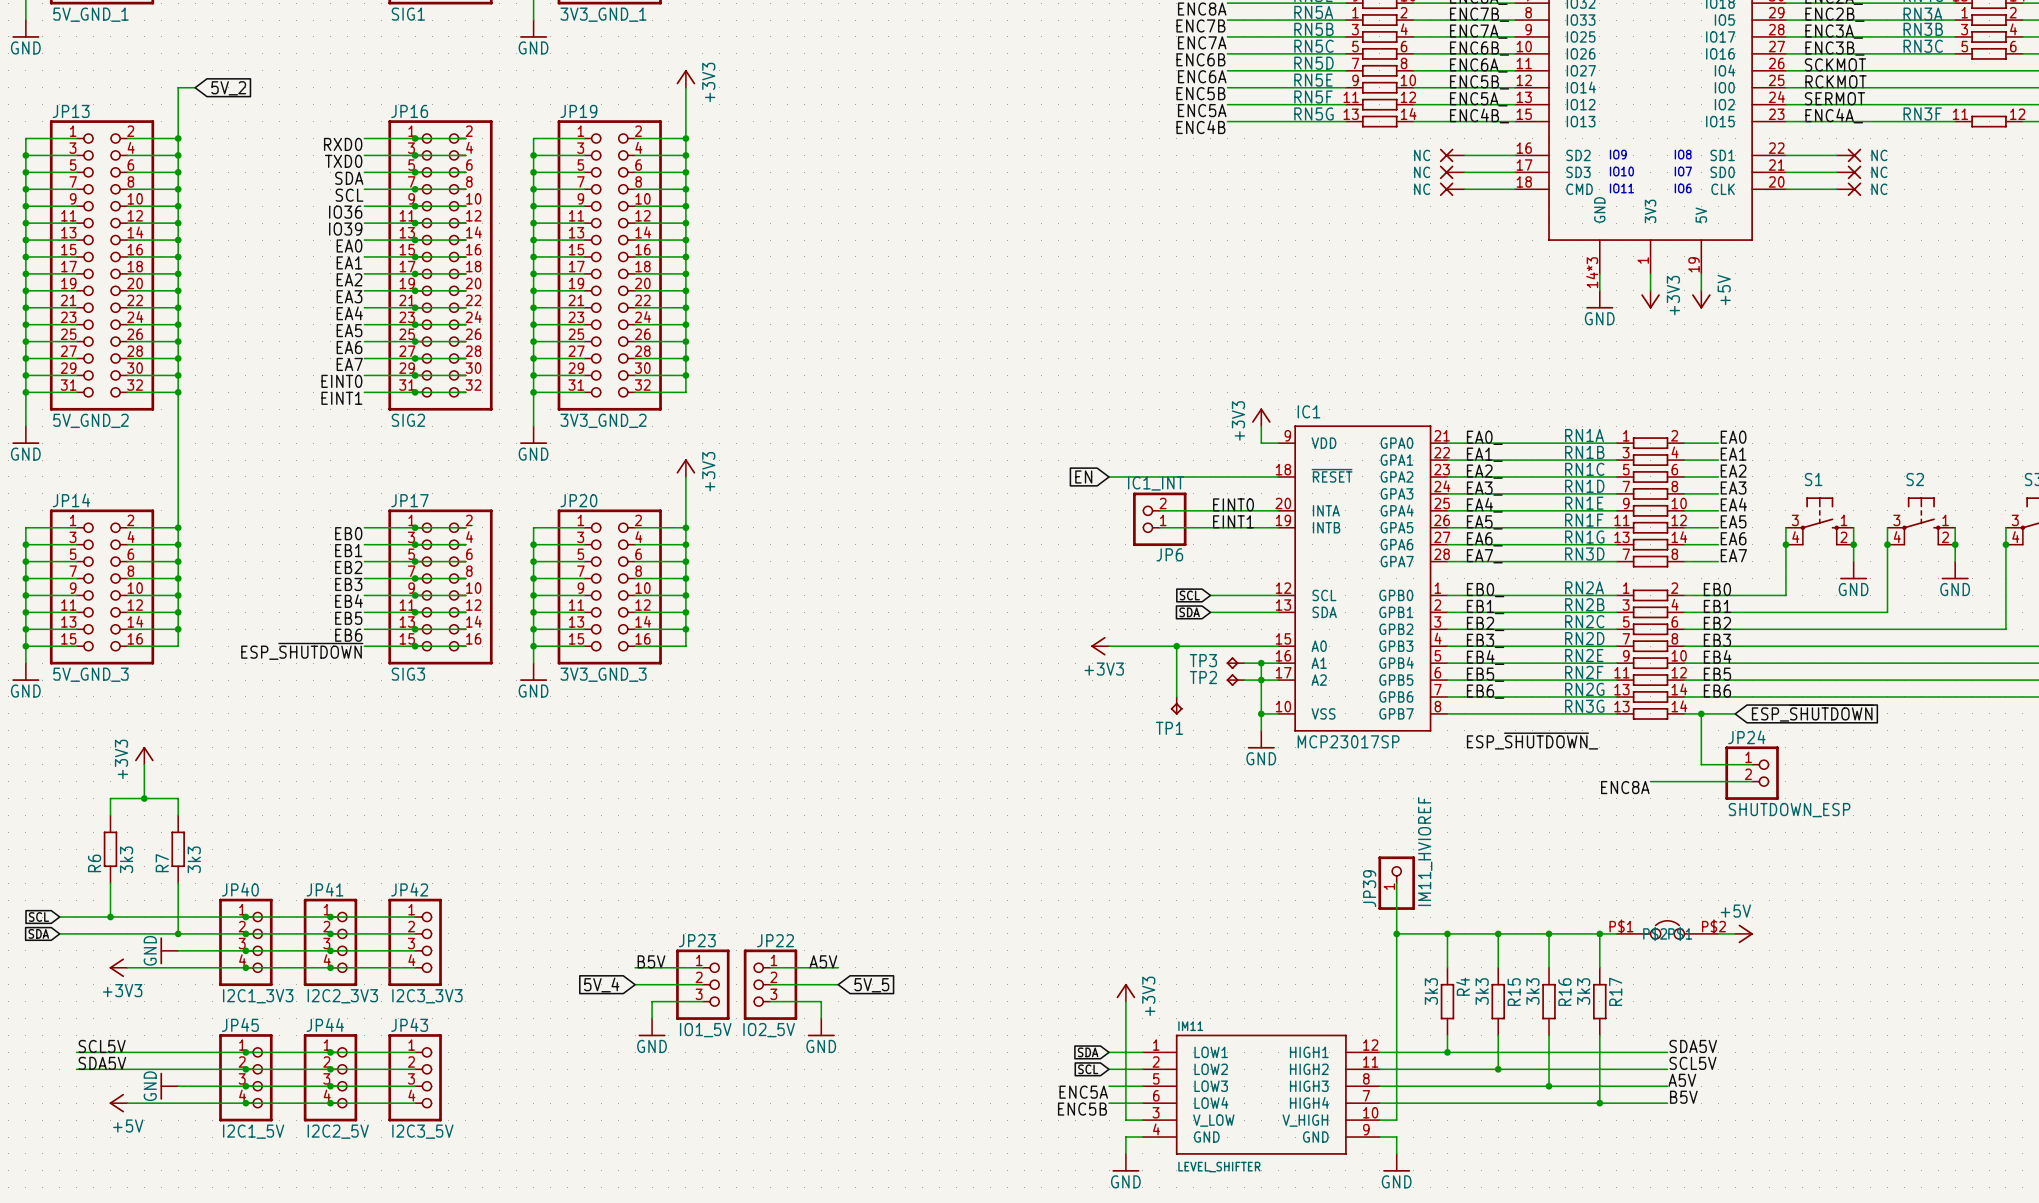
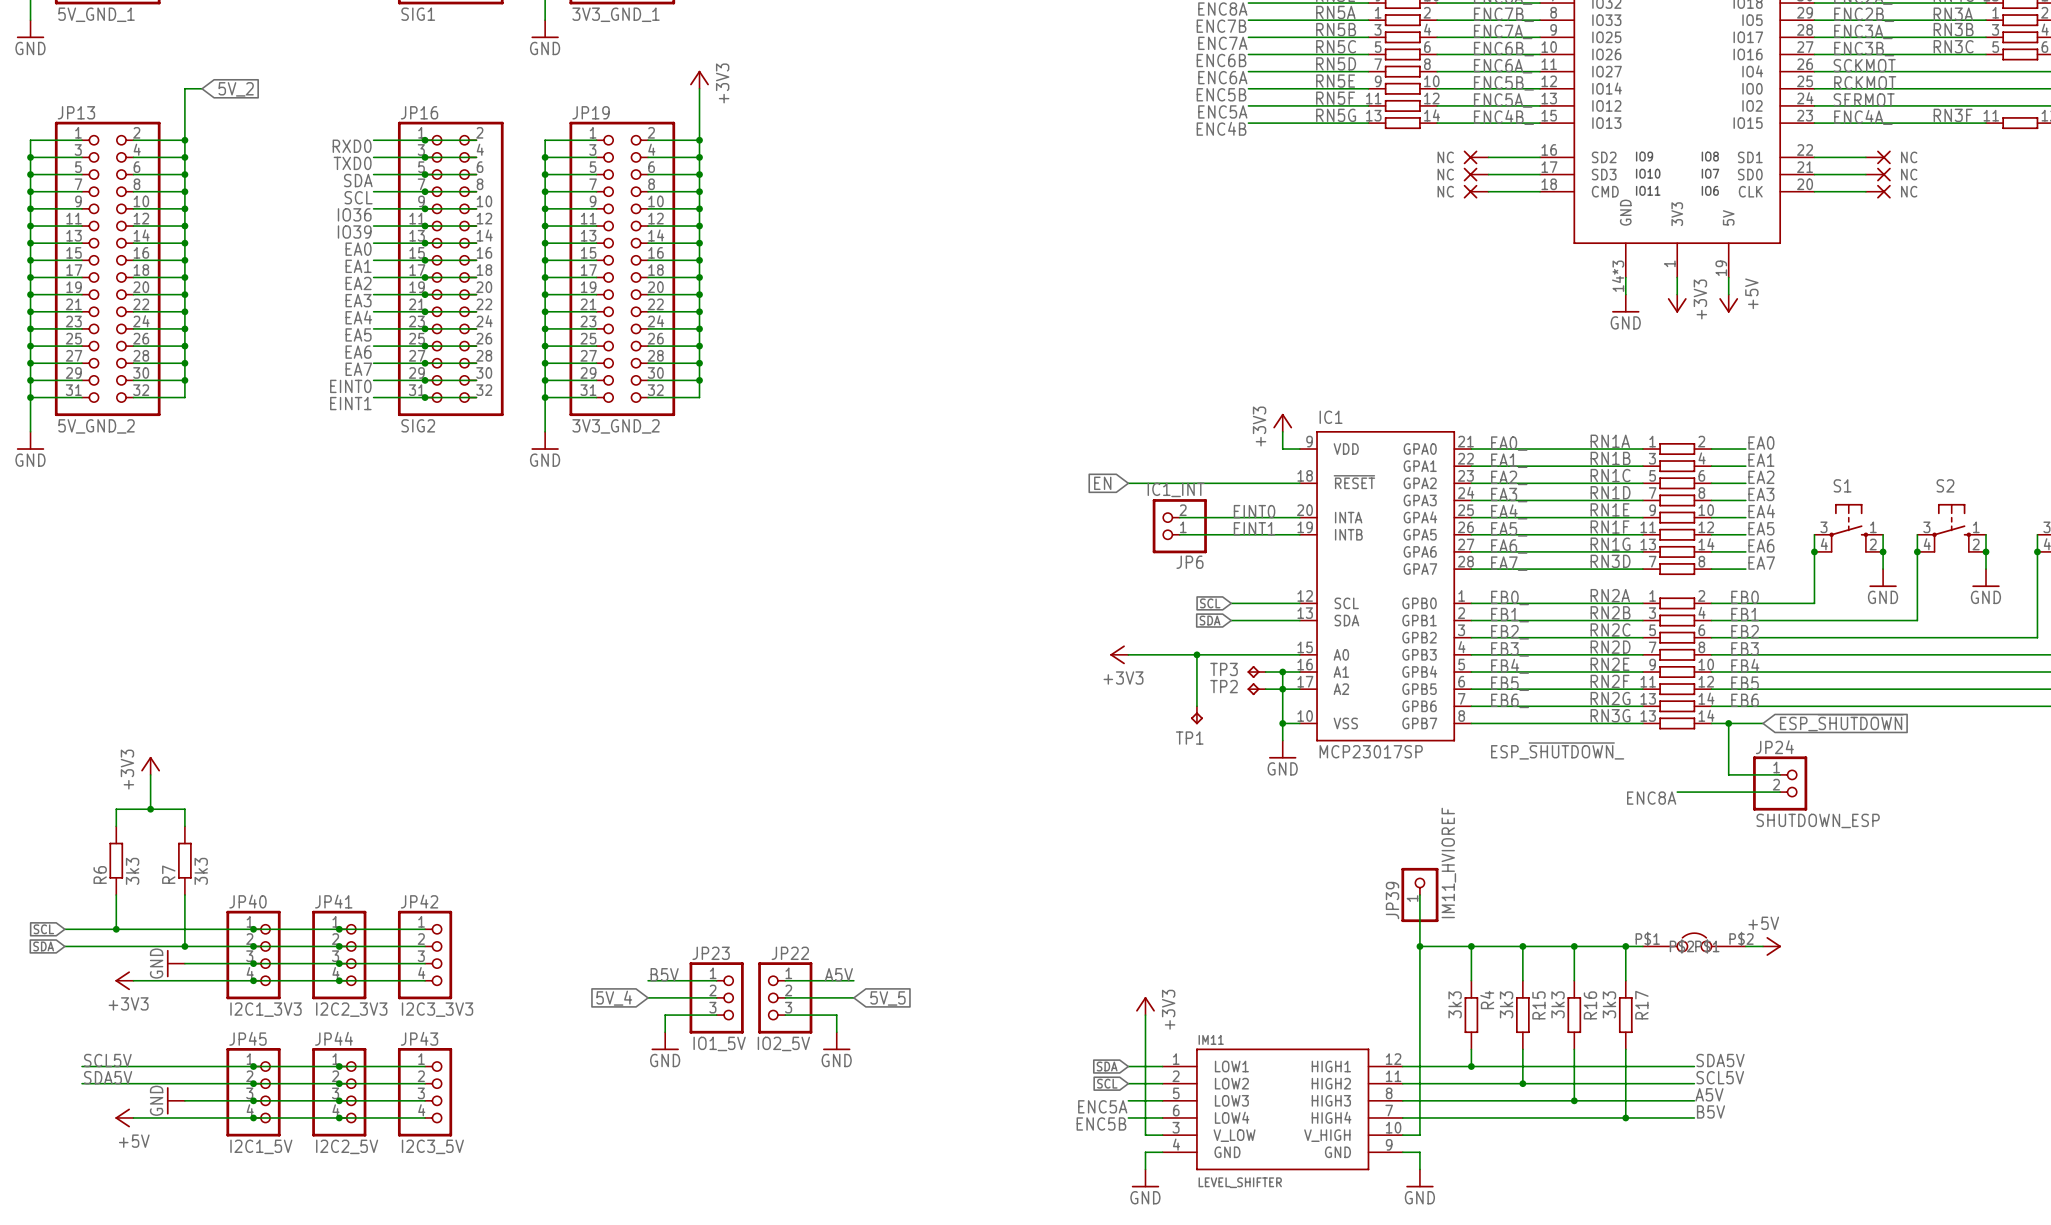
wire: (178, 392) (178, 646) (127, 646) -> none
junction: (178, 392) -> none
power symbol: +3V3 (685, 468) -> none
wire: (685, 476) (685, 646) (635, 646) -> none
wire: (76, 527) (25, 527) (25, 663) -> none
wire: (127, 527) (178, 527) -> none
junction: (178, 527) -> none
wire: (364, 527) (465, 527) -> none
junction: (415, 527) -> none
wire: (584, 527) (533, 527) (533, 663) -> none
wire: (635, 527) (685, 527) -> none
junction: (685, 527) -> none
label: EB0 (348, 533) -> none
wire: (25, 544) (76, 544) -> none
junction: (25, 544) -> none
wire: (127, 544) (178, 544) -> none
junction: (178, 544) -> none
wire: (364, 544) (465, 544) -> none
junction: (415, 544) -> none
wire: (533, 544) (584, 544) -> none
junction: (533, 544) -> none
wire: (635, 544) (685, 544) -> none
junction: (685, 544) -> none
label: EB1 (348, 550) -> none
wire: (25, 561) (76, 561) -> none
junction: (25, 561) -> none
wire: (127, 561) (178, 561) -> none
junction: (178, 561) -> none
wire: (364, 561) (465, 561) -> none
junction: (415, 561) -> none
wire: (533, 561) (584, 561) -> none
junction: (533, 561) -> none
wire: (635, 561) (685, 561) -> none
junction: (685, 561) -> none
label: EB2 (348, 567) -> none
wire: (25, 578) (76, 578) -> none
junction: (25, 578) -> none
wire: (127, 578) (178, 578) -> none
junction: (178, 578) -> none
wire: (364, 578) (465, 578) -> none
junction: (415, 578) -> none
wire: (533, 578) (584, 578) -> none
junction: (533, 578) -> none
wire: (635, 578) (685, 578) -> none
junction: (685, 578) -> none
label: EB3 (348, 584) -> none
JP14: 5V_GND_3 (102, 586) -> none
JP17: SIG3 (440, 586) -> none
JP20: 3V3_GND_3 (609, 586) -> none
wire: (25, 595) (76, 595) -> none
junction: (25, 595) -> none
wire: (127, 595) (178, 595) -> none
junction: (178, 595) -> none
wire: (364, 595) (465, 595) -> none
junction: (415, 595) -> none
wire: (533, 595) (584, 595) -> none
junction: (533, 595) -> none
wire: (635, 595) (685, 595) -> none
junction: (685, 595) -> none
label: EB4 (349, 601) -> none
wire: (25, 612) (76, 612) -> none
junction: (25, 612) -> none
wire: (127, 612) (178, 612) -> none
junction: (178, 612) -> none
wire: (364, 612) (465, 612) -> none
junction: (415, 612) -> none
wire: (533, 612) (584, 612) -> none
junction: (533, 612) -> none
wire: (635, 612) (685, 612) -> none
junction: (685, 612) -> none
label: EB5 (348, 618) -> none
wire: (25, 629) (76, 629) -> none
junction: (25, 629) -> none
wire: (127, 629) (178, 629) -> none
junction: (178, 629) -> none
wire: (364, 629) (465, 629) -> none
junction: (415, 629) -> none
wire: (533, 629) (584, 629) -> none
junction: (533, 629) -> none
wire: (635, 629) (685, 629) -> none
junction: (685, 629) -> none
label: EB6 (348, 635) -> none
wire: (25, 646) (76, 646) -> none
junction: (25, 646) -> none
wire: (364, 646) (465, 646) -> none
junction: (415, 646) -> none
wire: (533, 646) (584, 646) -> none
junction: (533, 646) -> none
label: ESP_~{SHUTDOWN} (302, 651) -> none
power symbol: GND (25, 672) -> none
power symbol: GND (533, 672) -> none

